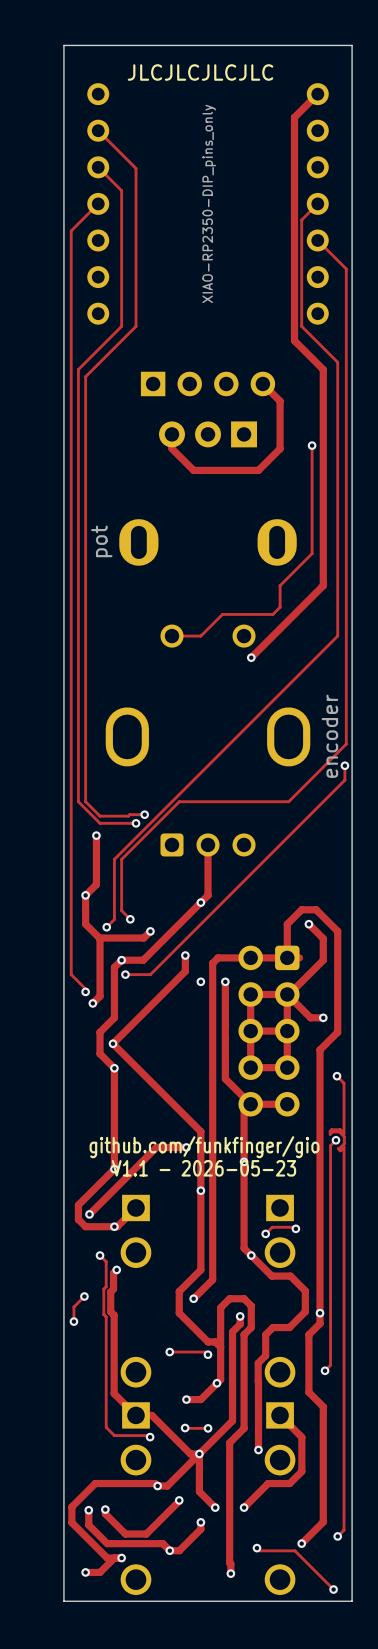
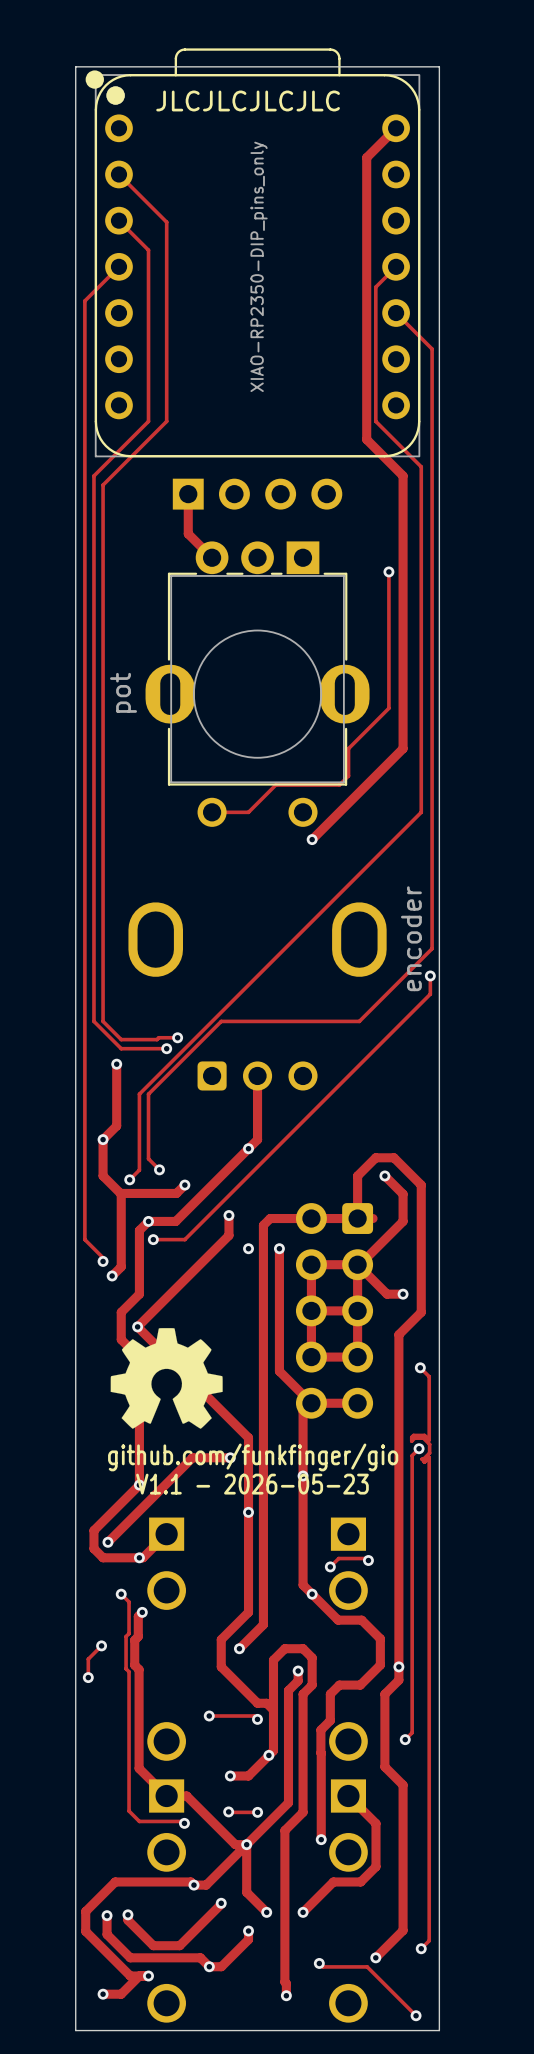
part footprint: [87, 83, 329, 325] -> [85, 48, 421, 458]
track: (262, 383) (280, 401) (280, 448) (258, 470) (193, 470) (172, 448) (172, 434) -> (188, 494) (188, 533) (212, 557)
part: pot (208, 493) -> none
part: none -> pot (257, 663)
drawing: none -> [110, 1328, 223, 1429]

